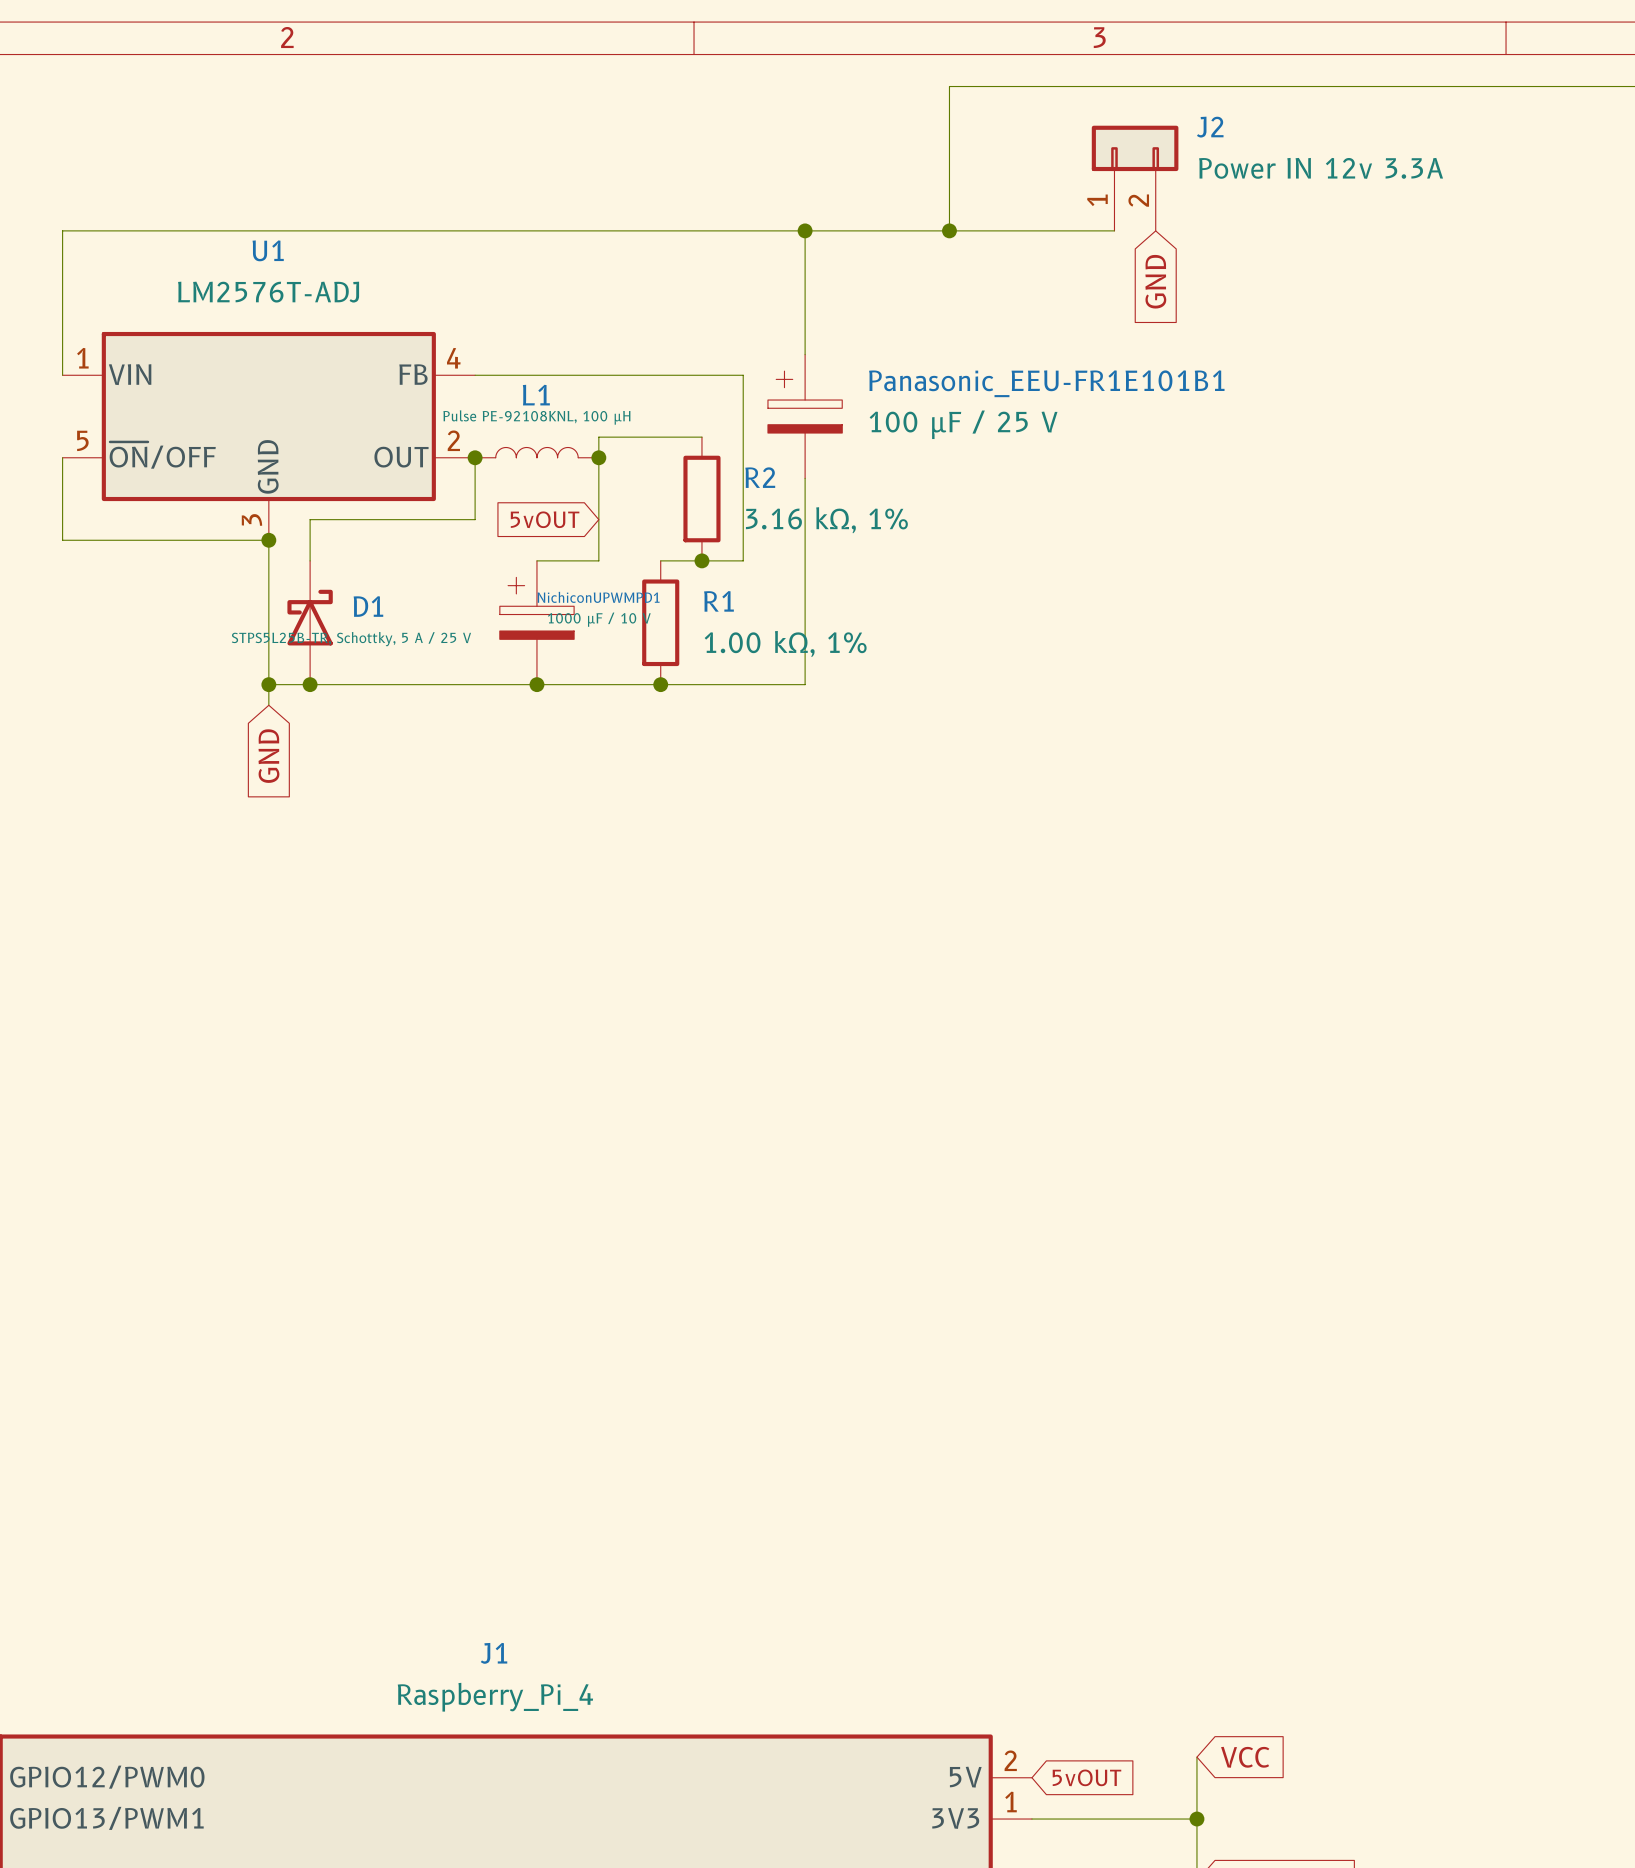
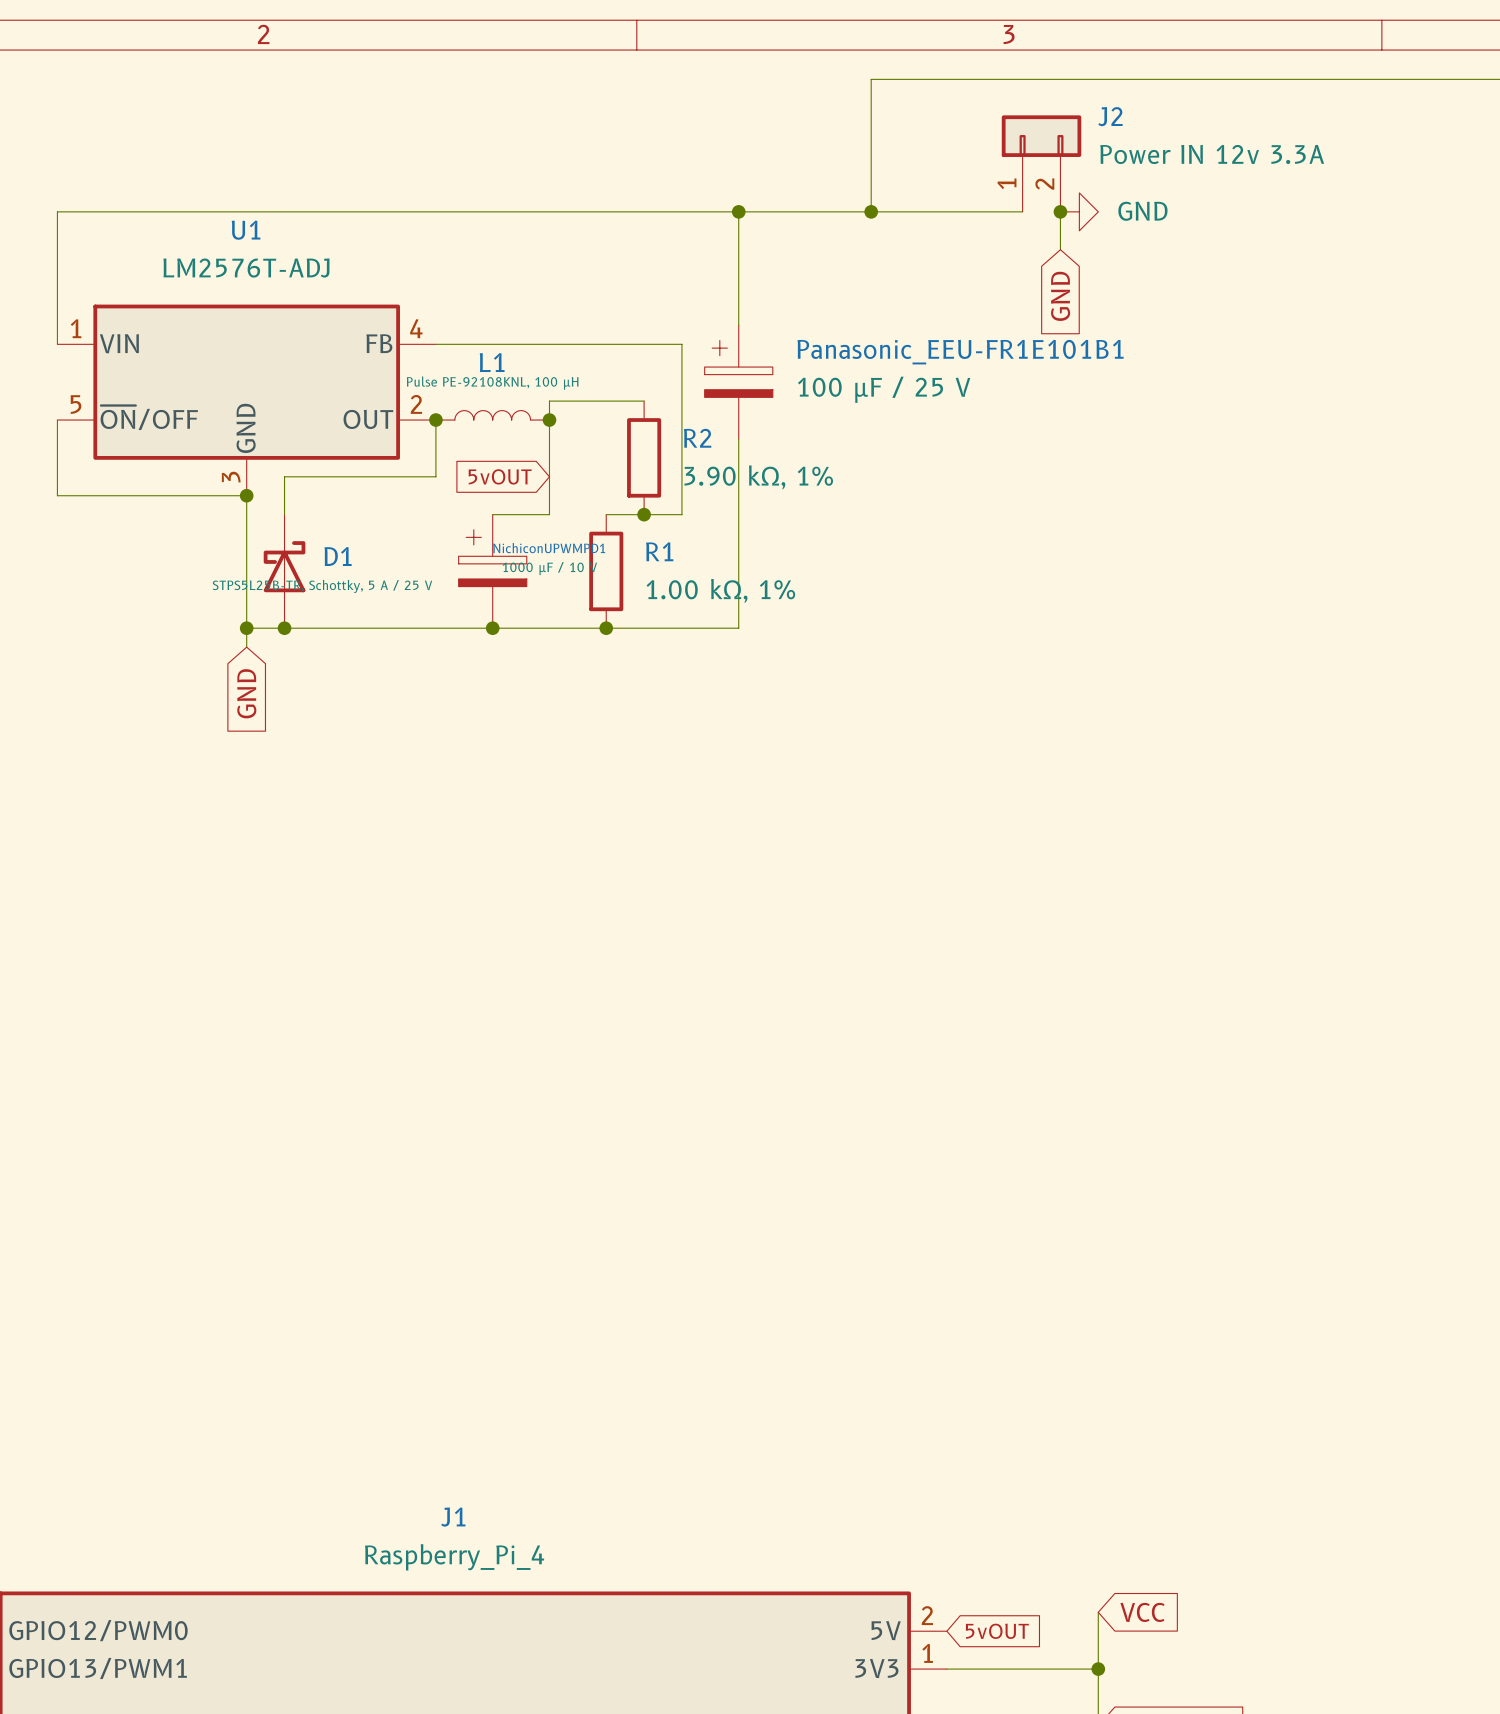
wire: none -> (1060, 211) (1060, 249)
junction: none -> (1060, 211)
power symbol: none -> GND (1079, 211)
global label position: GND (1155, 281) -> GND (1060, 296)
R2 value: 3.16 kΩ, 1% (826, 520) -> 3.90 kΩ, 1% (758, 477)

